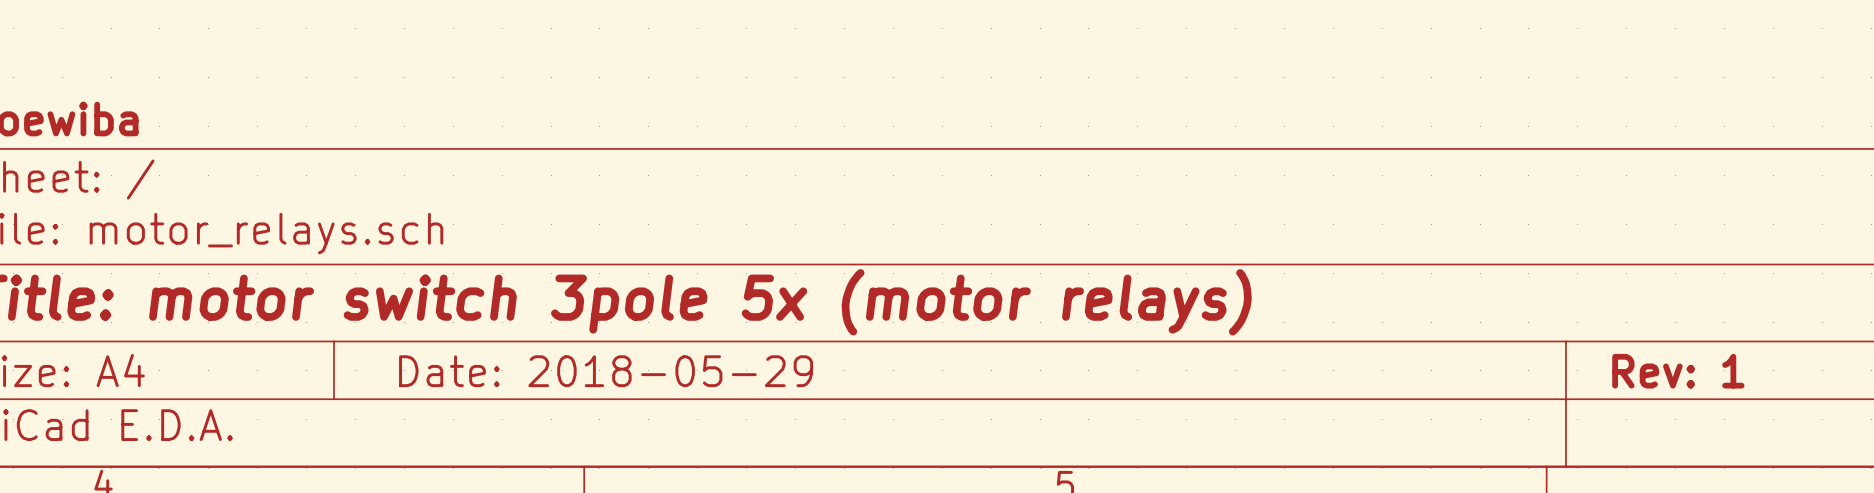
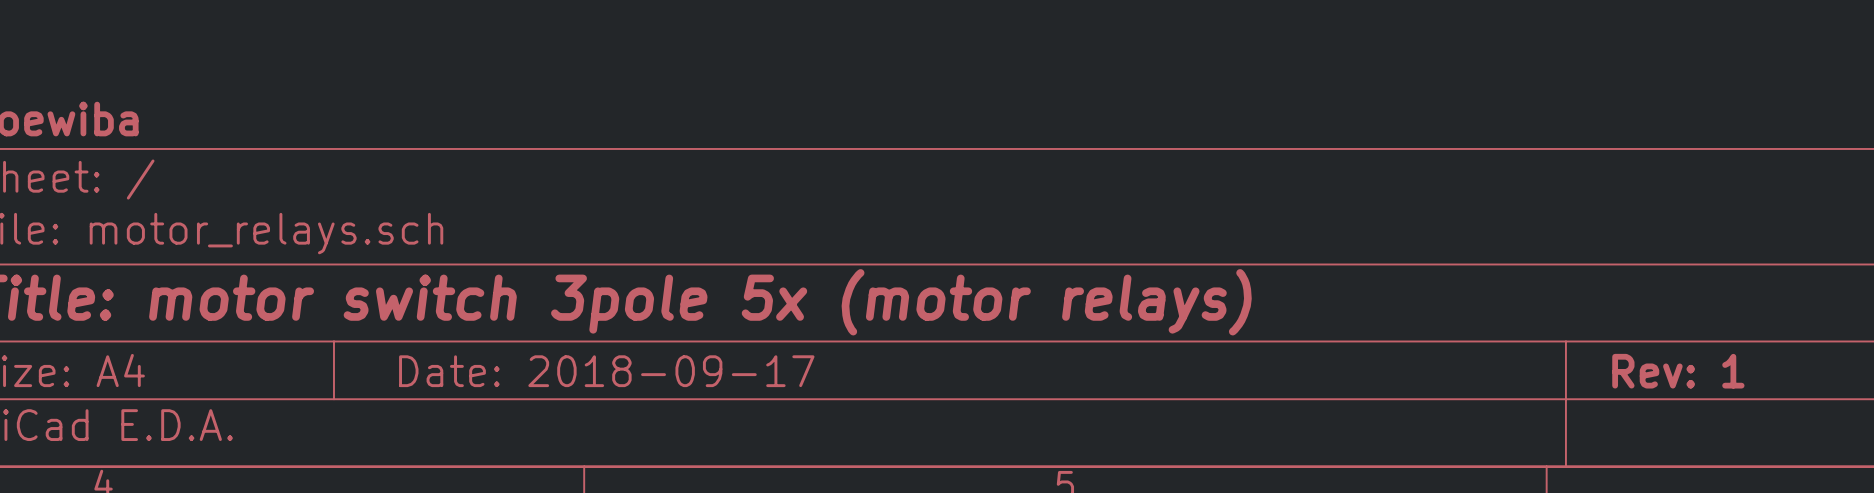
title block: Date: 2018-05-29 (606, 371) -> Date: 2018-09-17 (606, 371)

